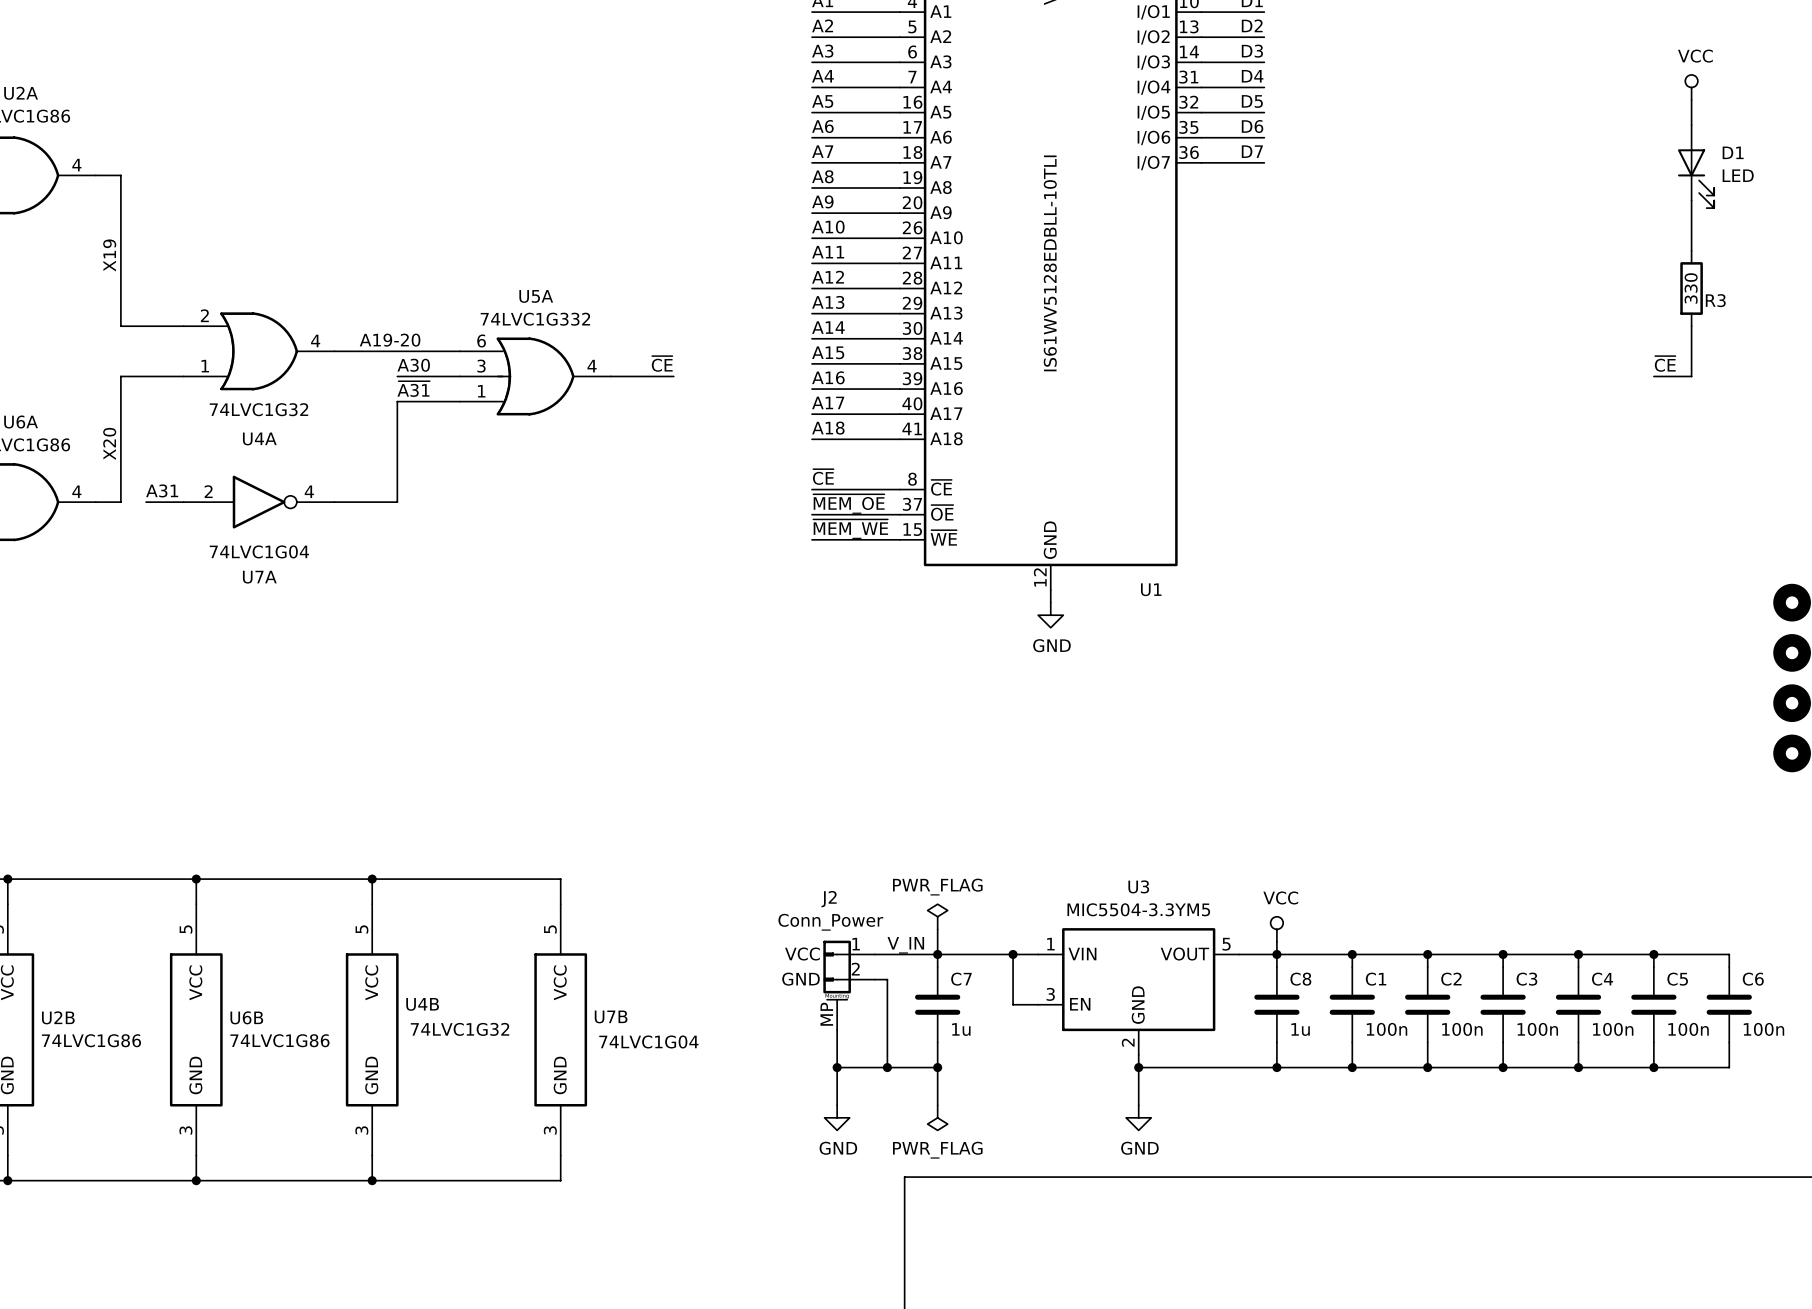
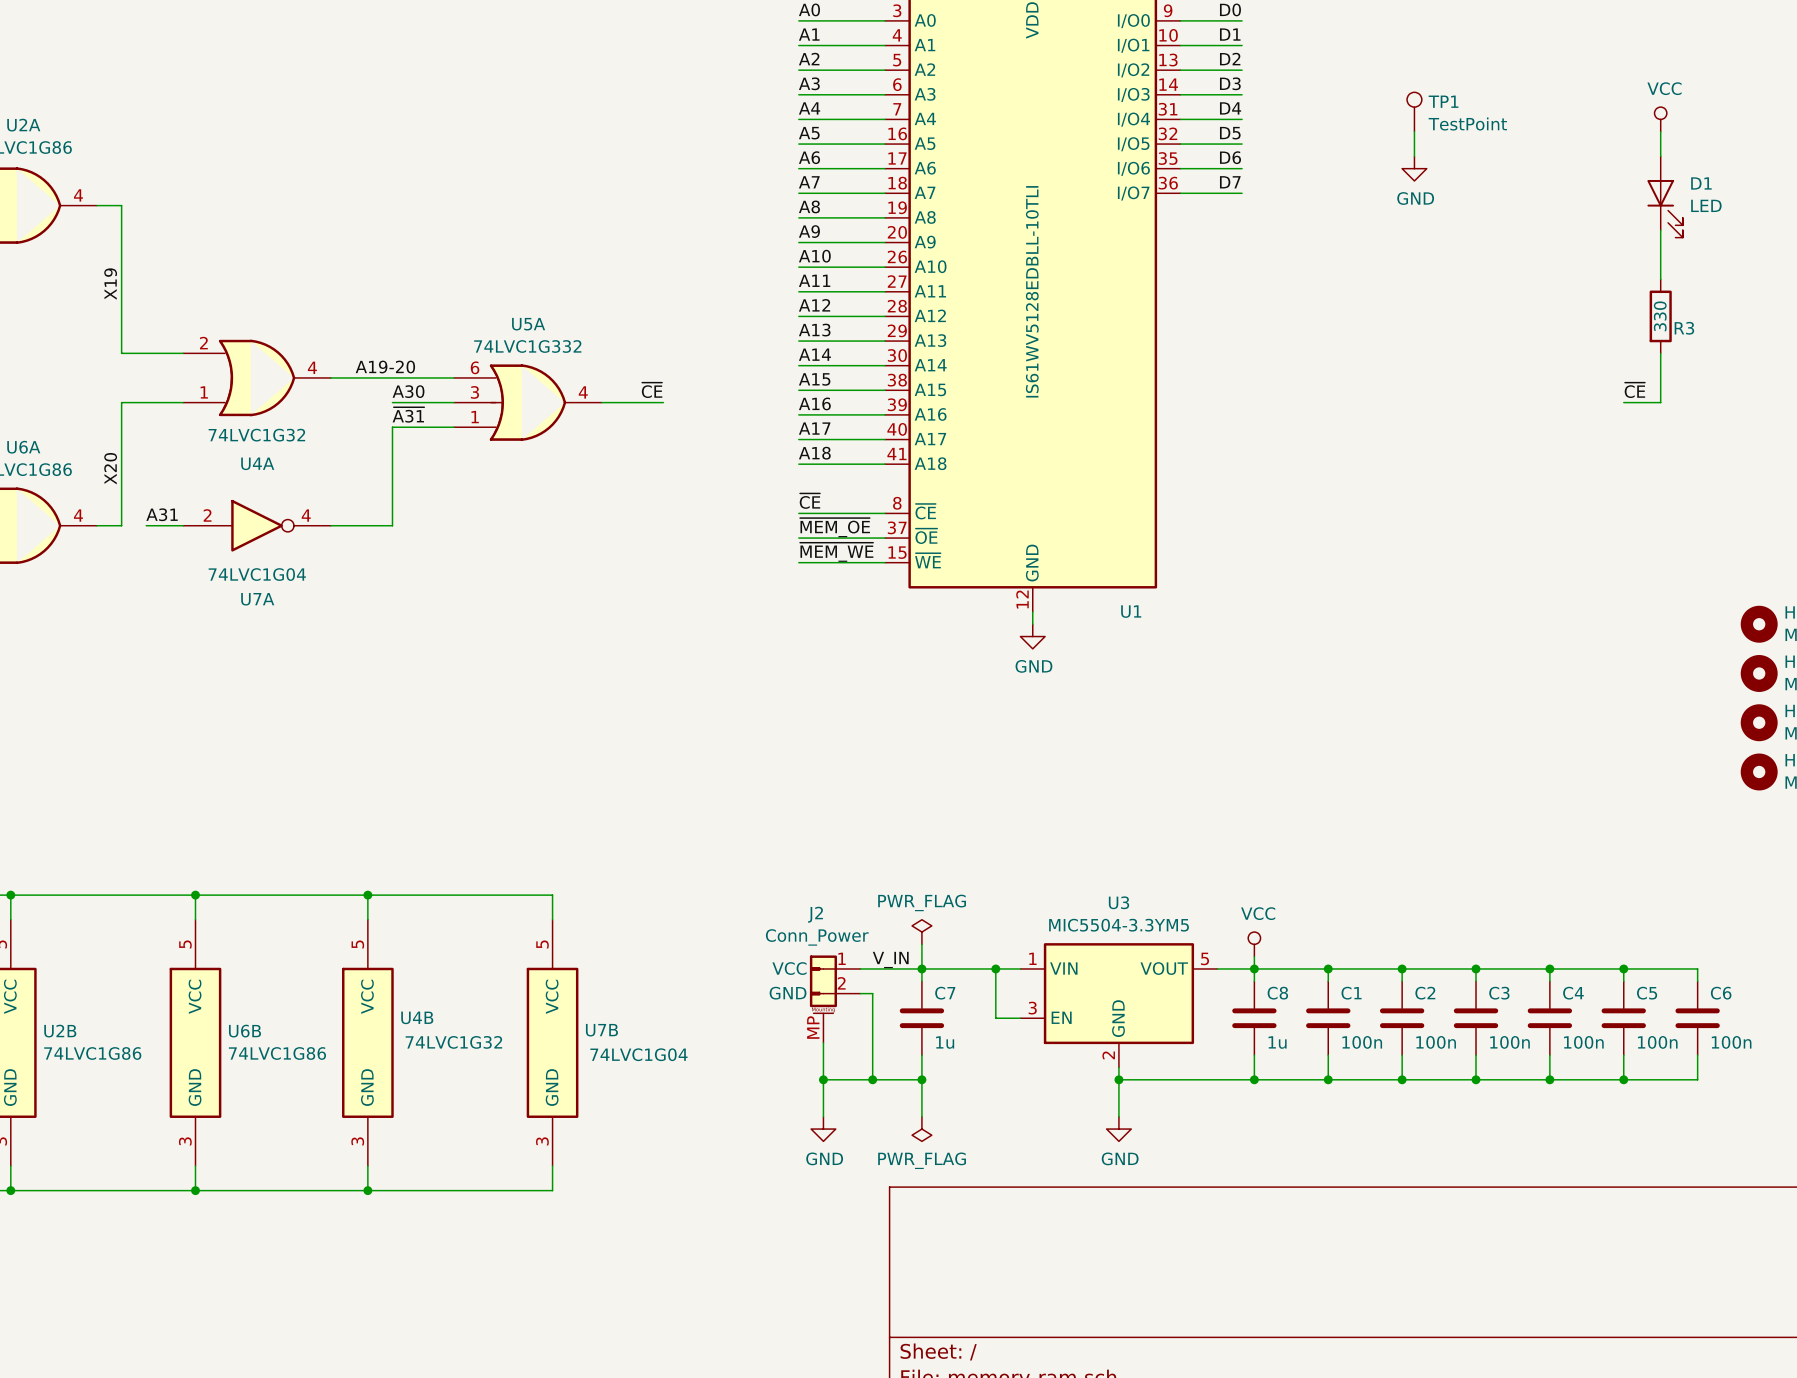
TP1: none -> TestPoint (1414, 112)
wire: none -> (1414, 131) (1414, 156)
power symbol: none -> GND (1414, 168)

